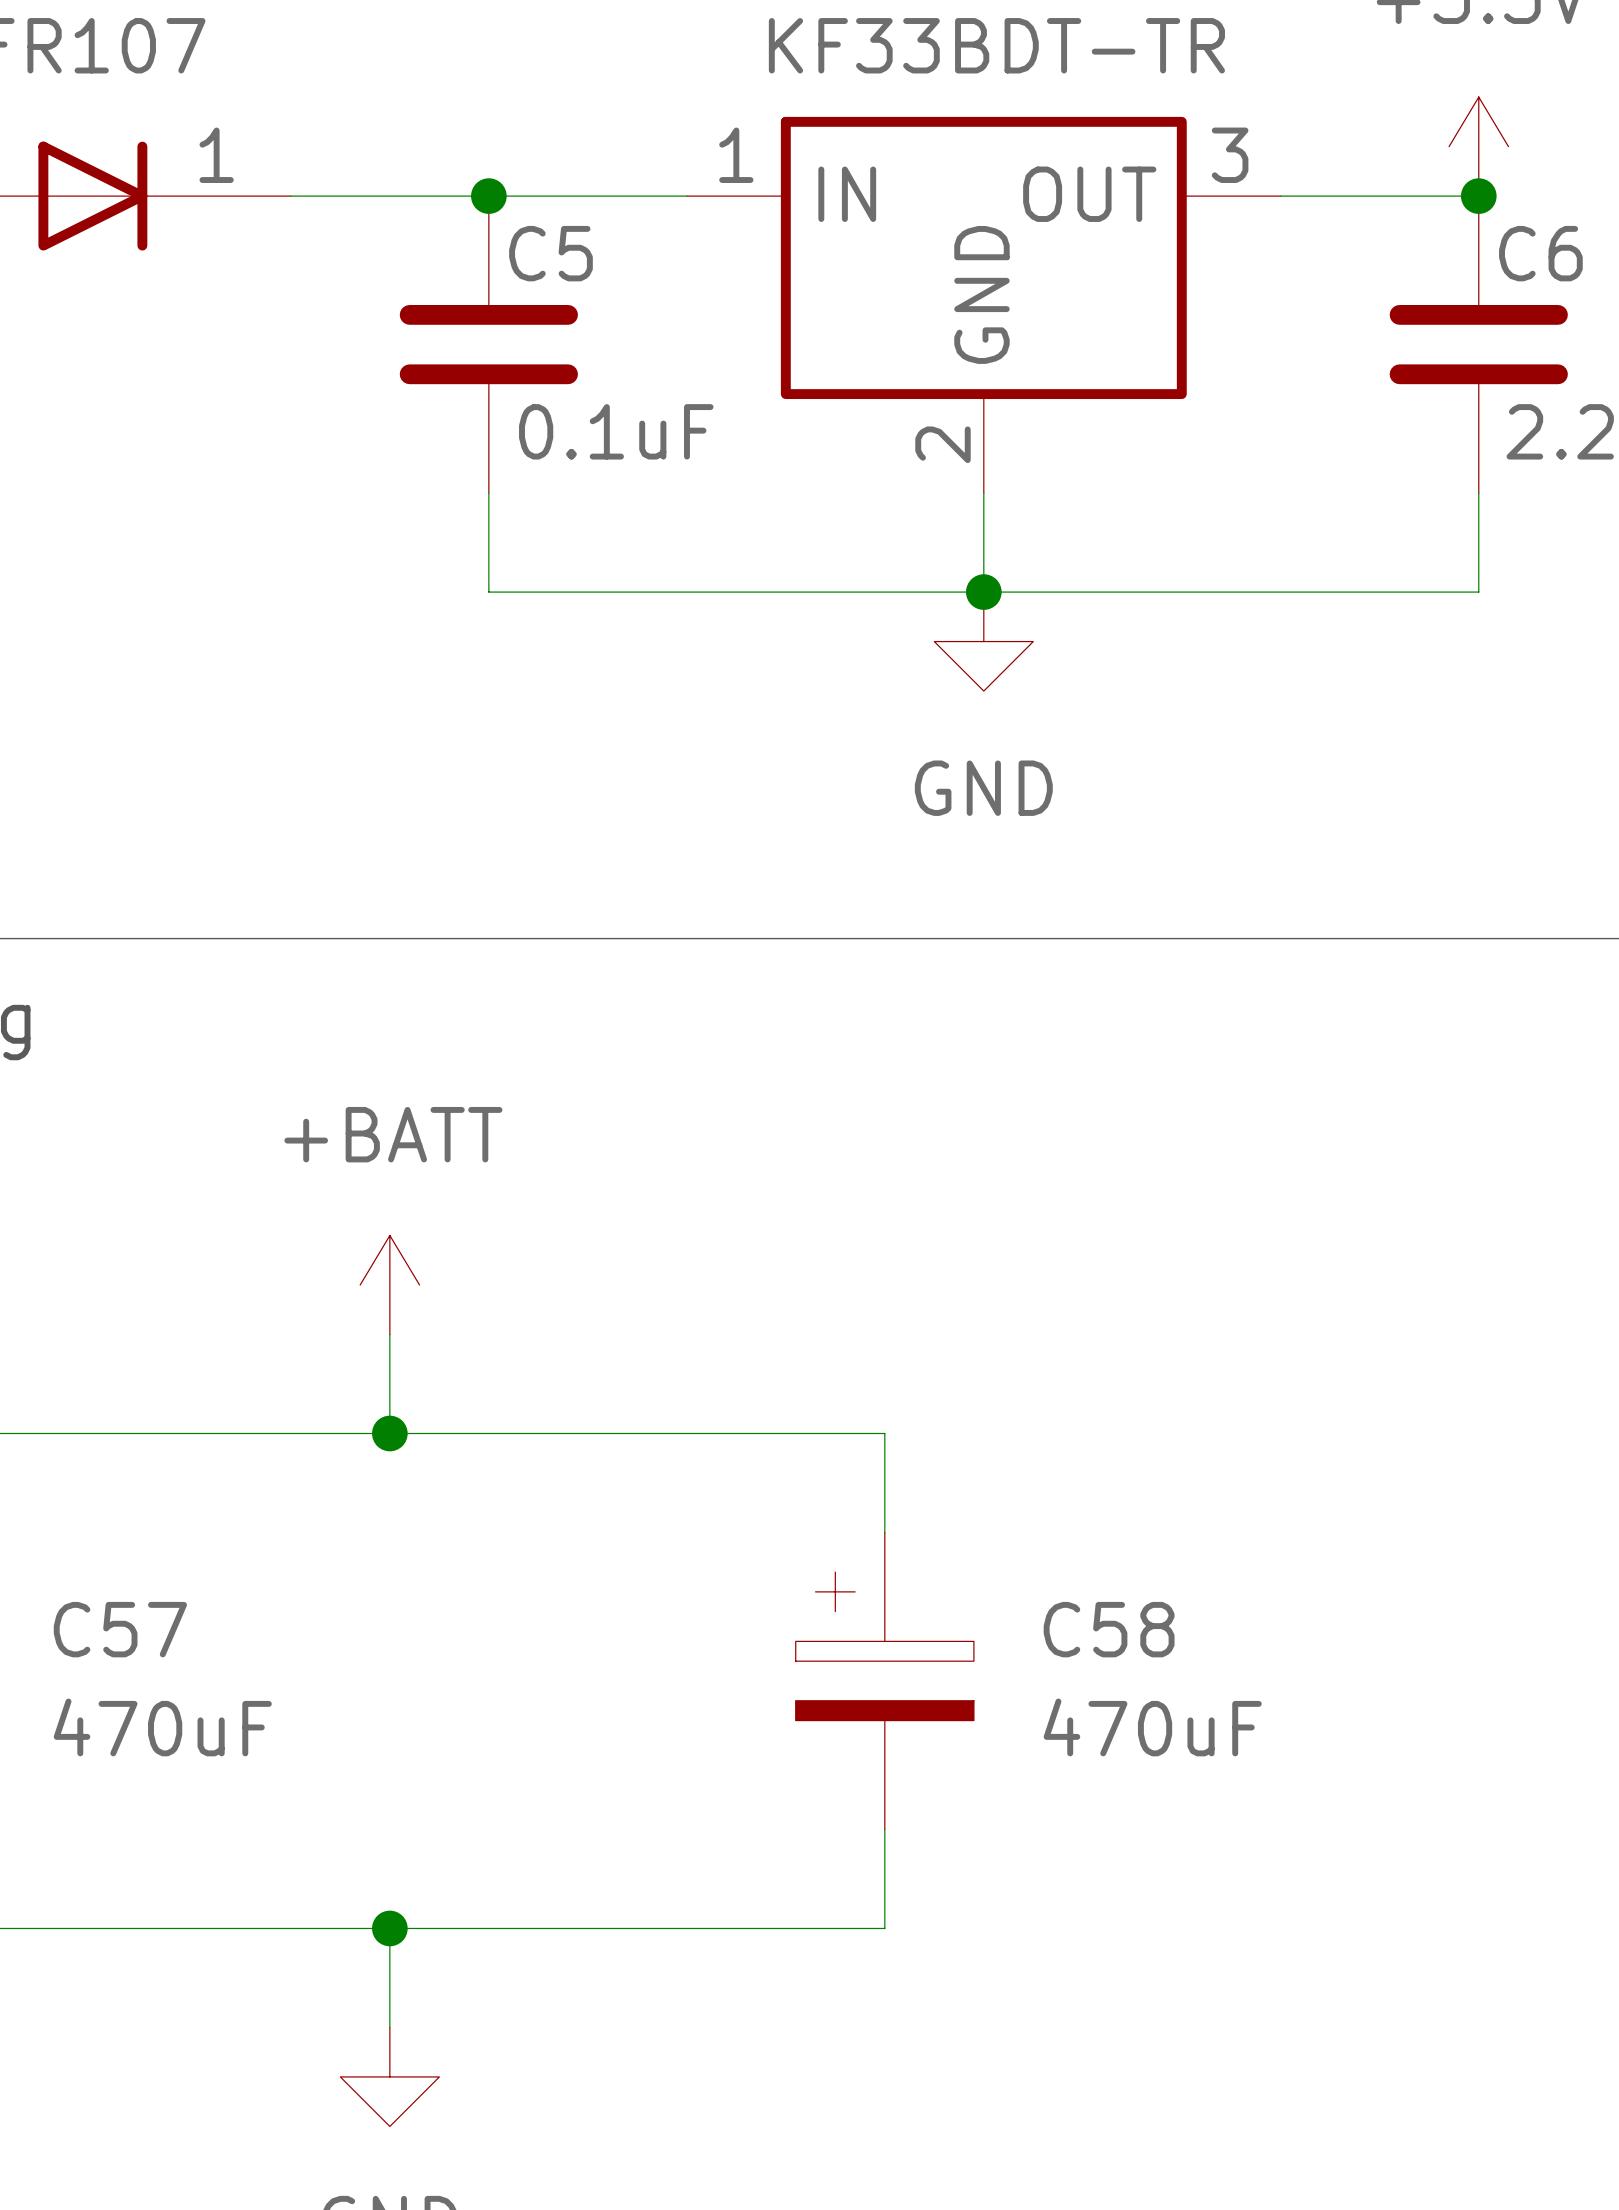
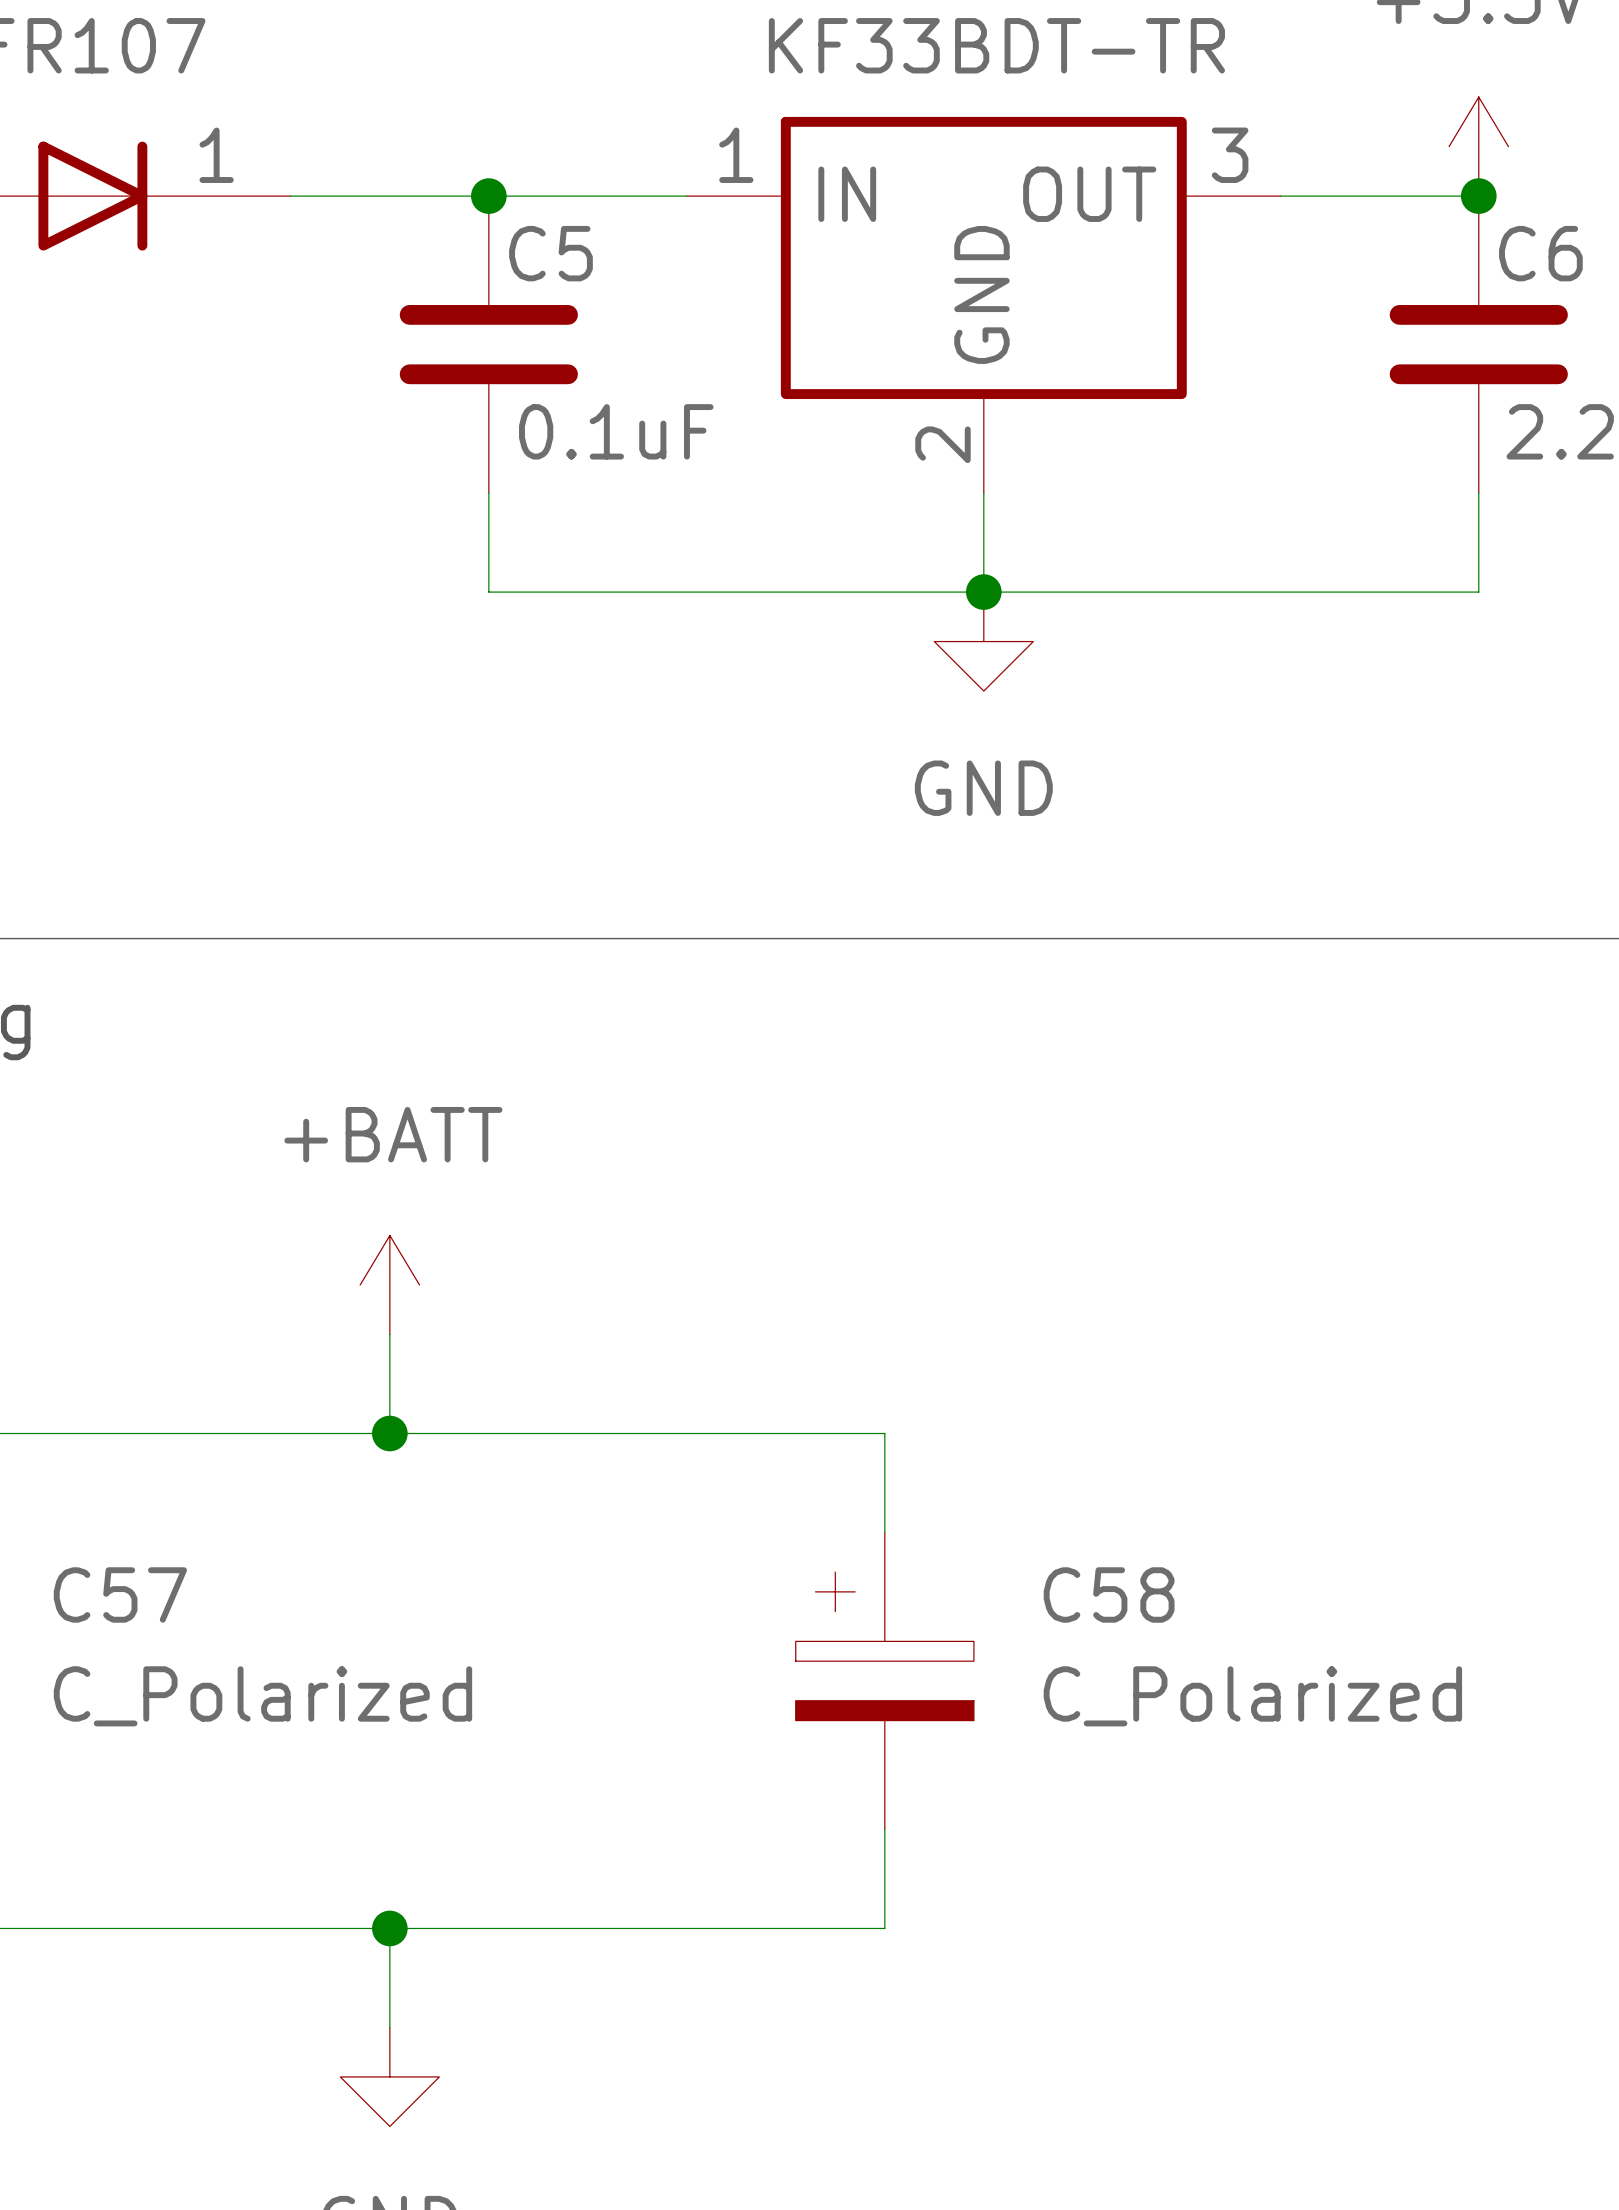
C57 name position: C57 (120, 1629) -> C57 (120, 1594)
C58 name position: C58 (1109, 1629) -> C58 (1109, 1594)
C57 value: 470uF (162, 1727) -> C_Polarized (262, 1696)
C58 value: 470uF (1152, 1727) -> C_Polarized (1252, 1696)

